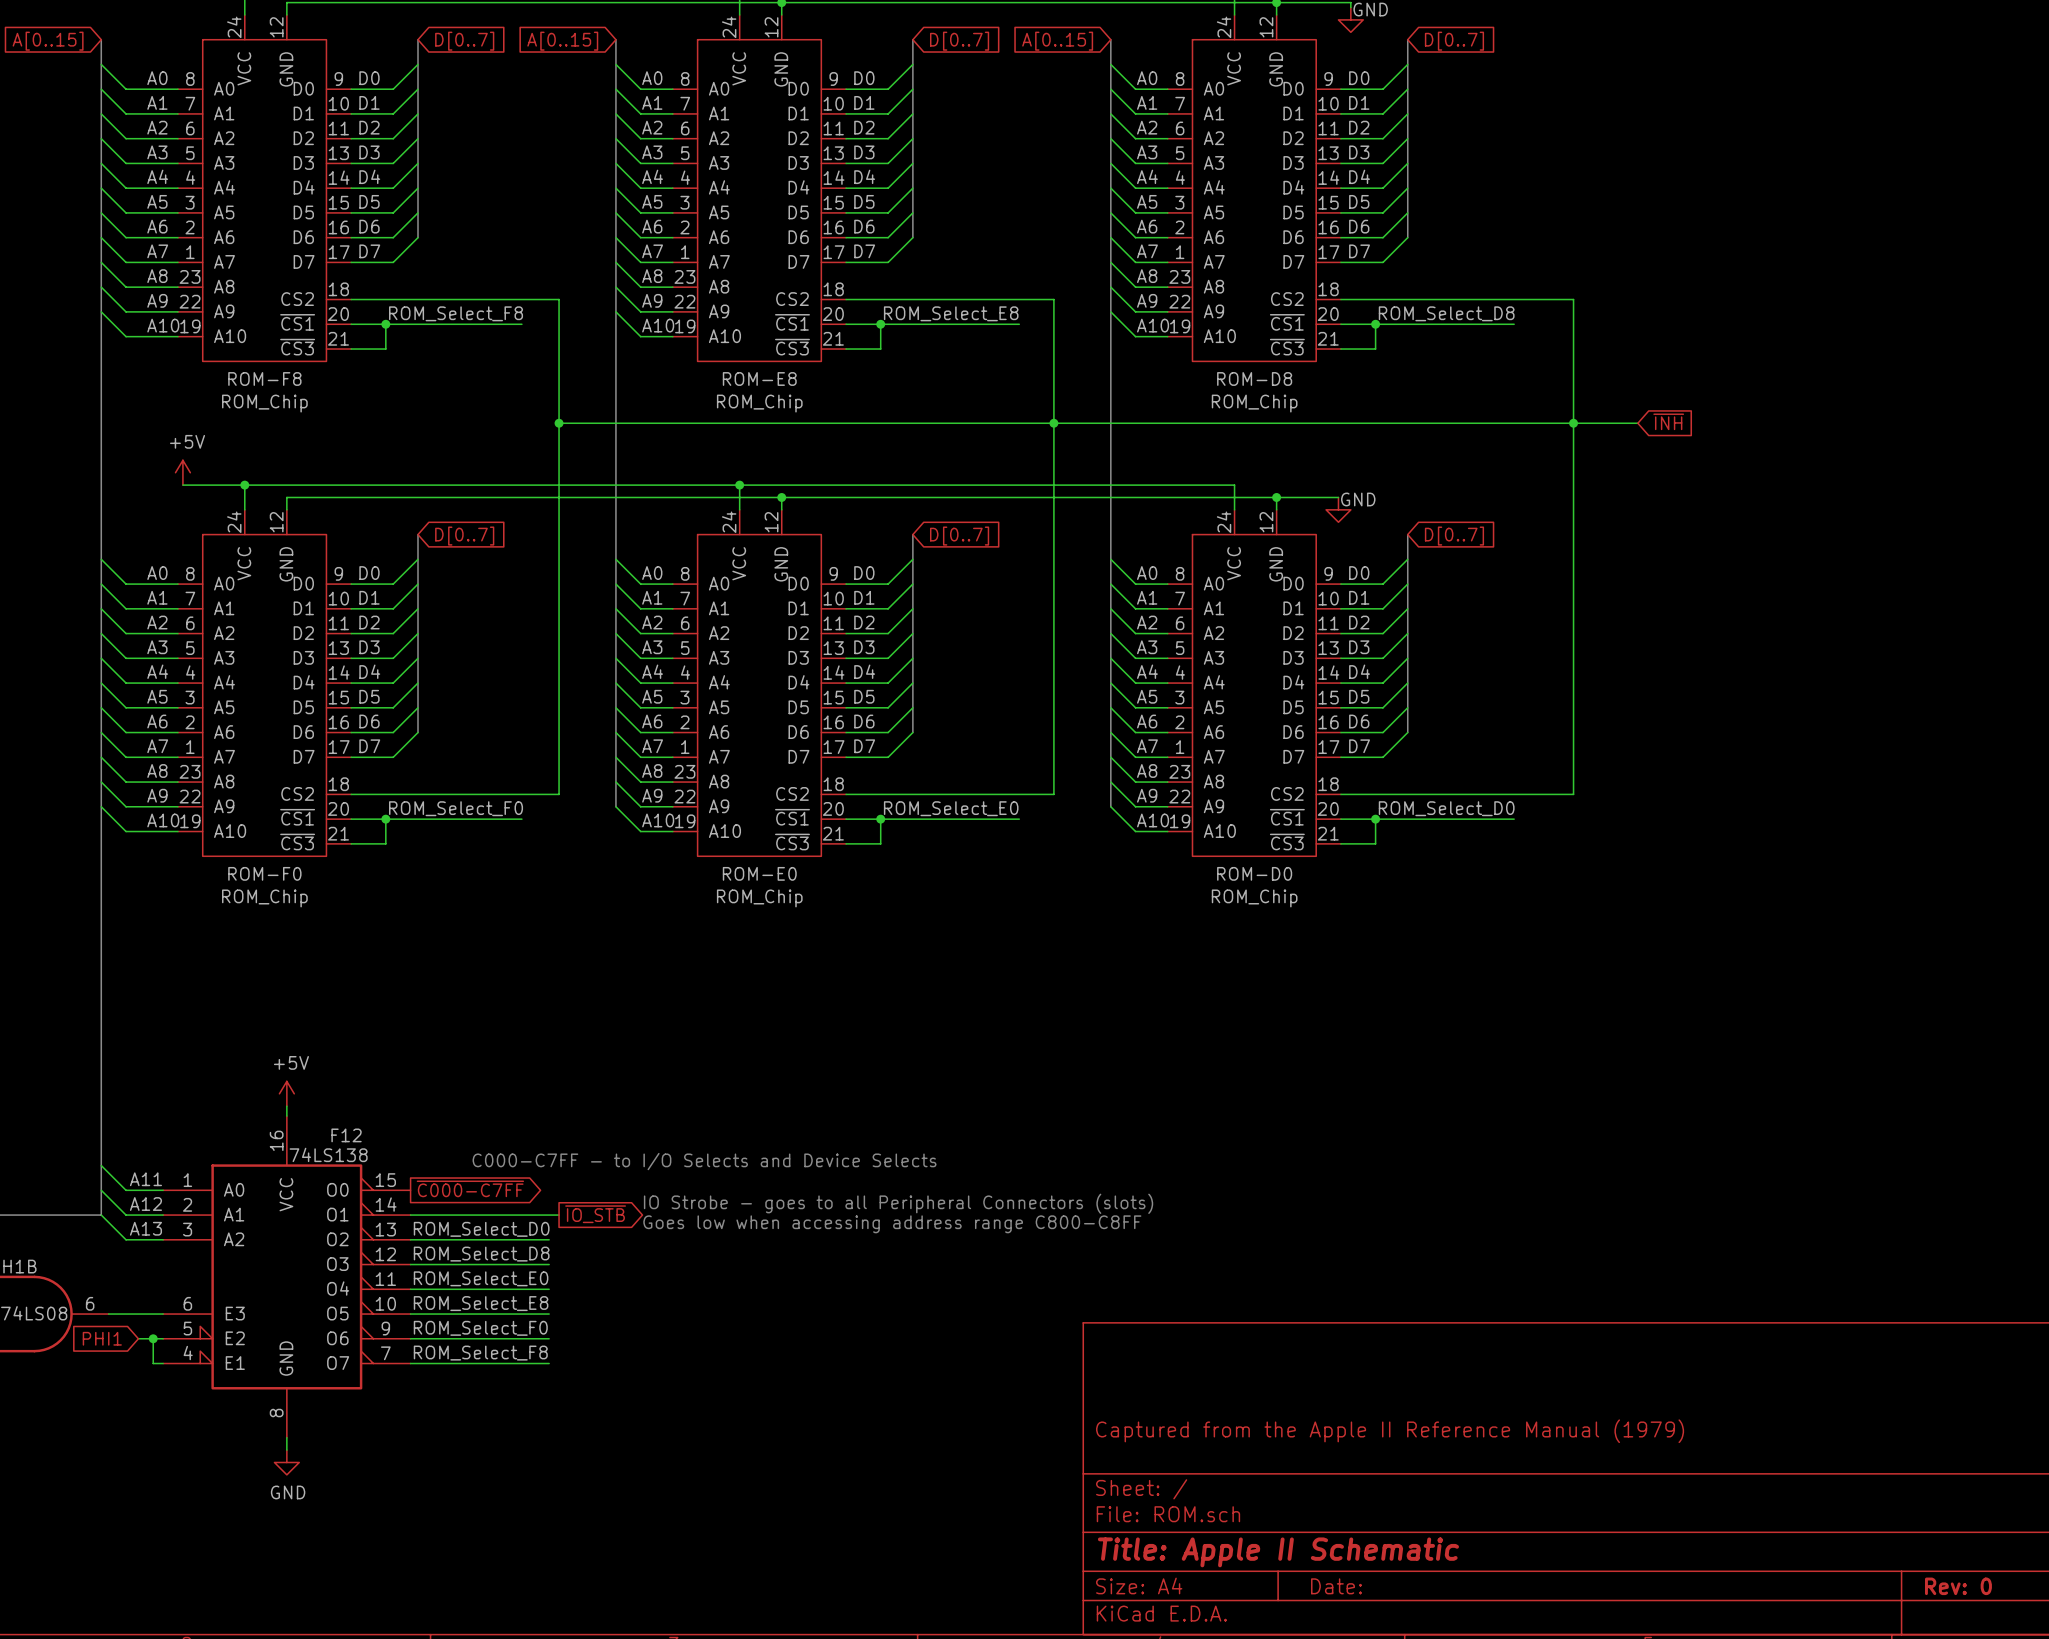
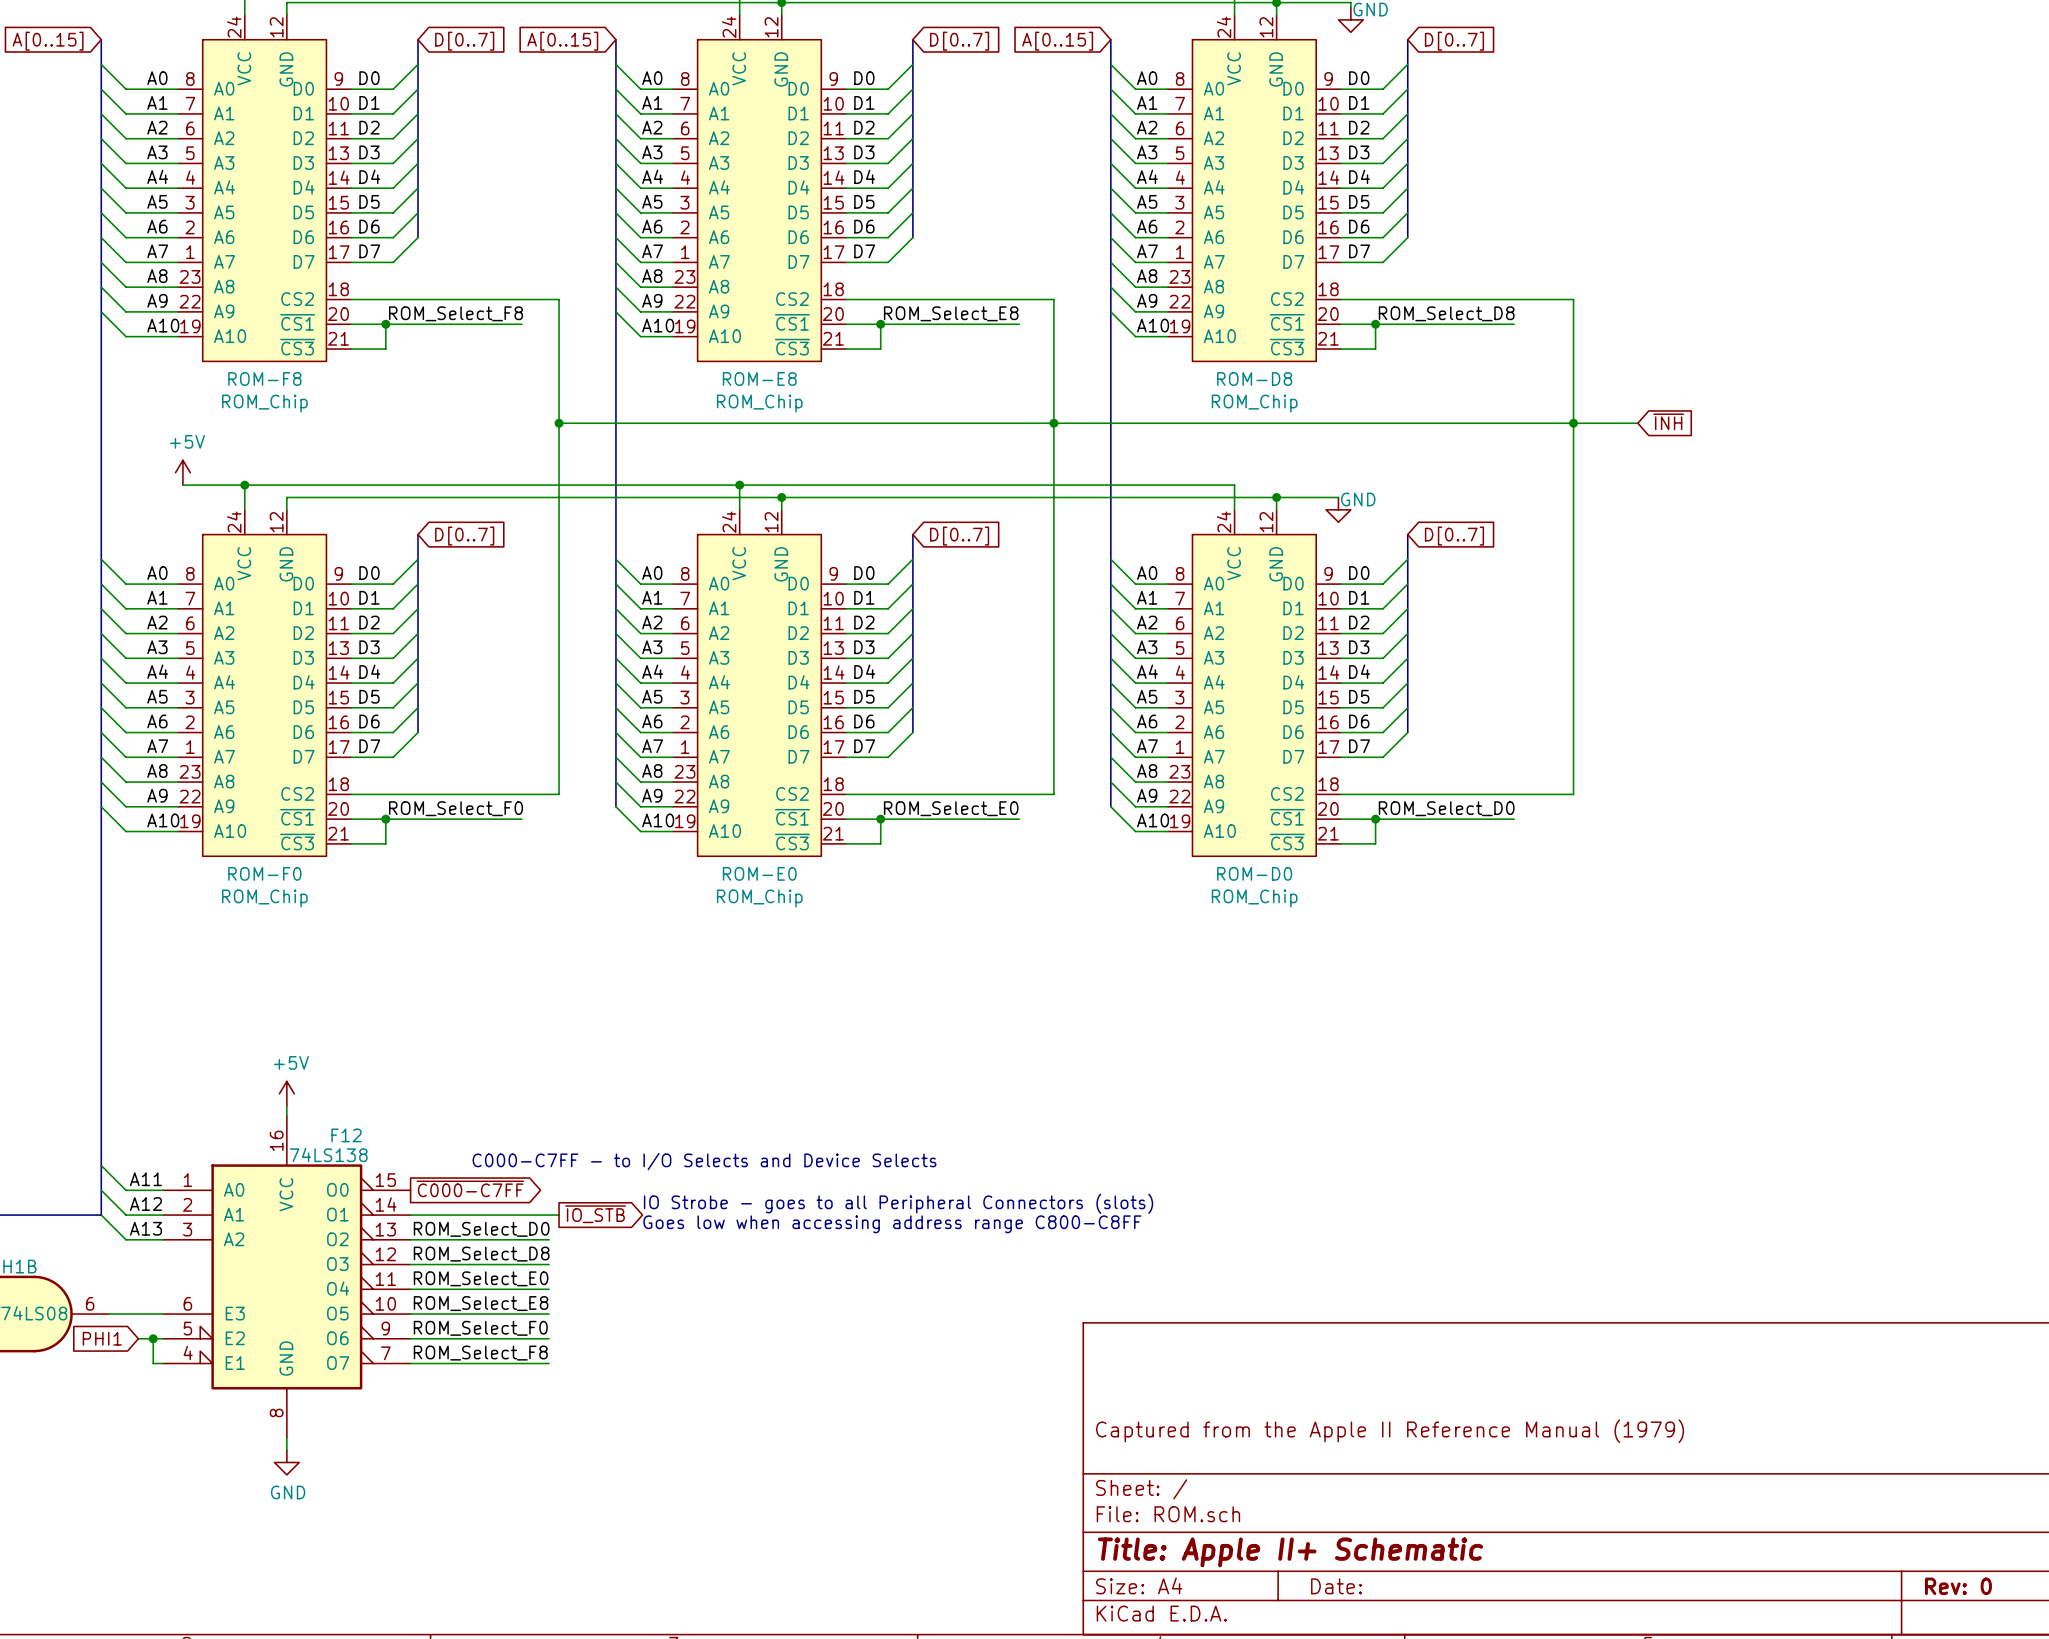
title block: Title: Apple II Schematic (1278, 1552) -> Title: Apple II+ Schematic (1290, 1552)

